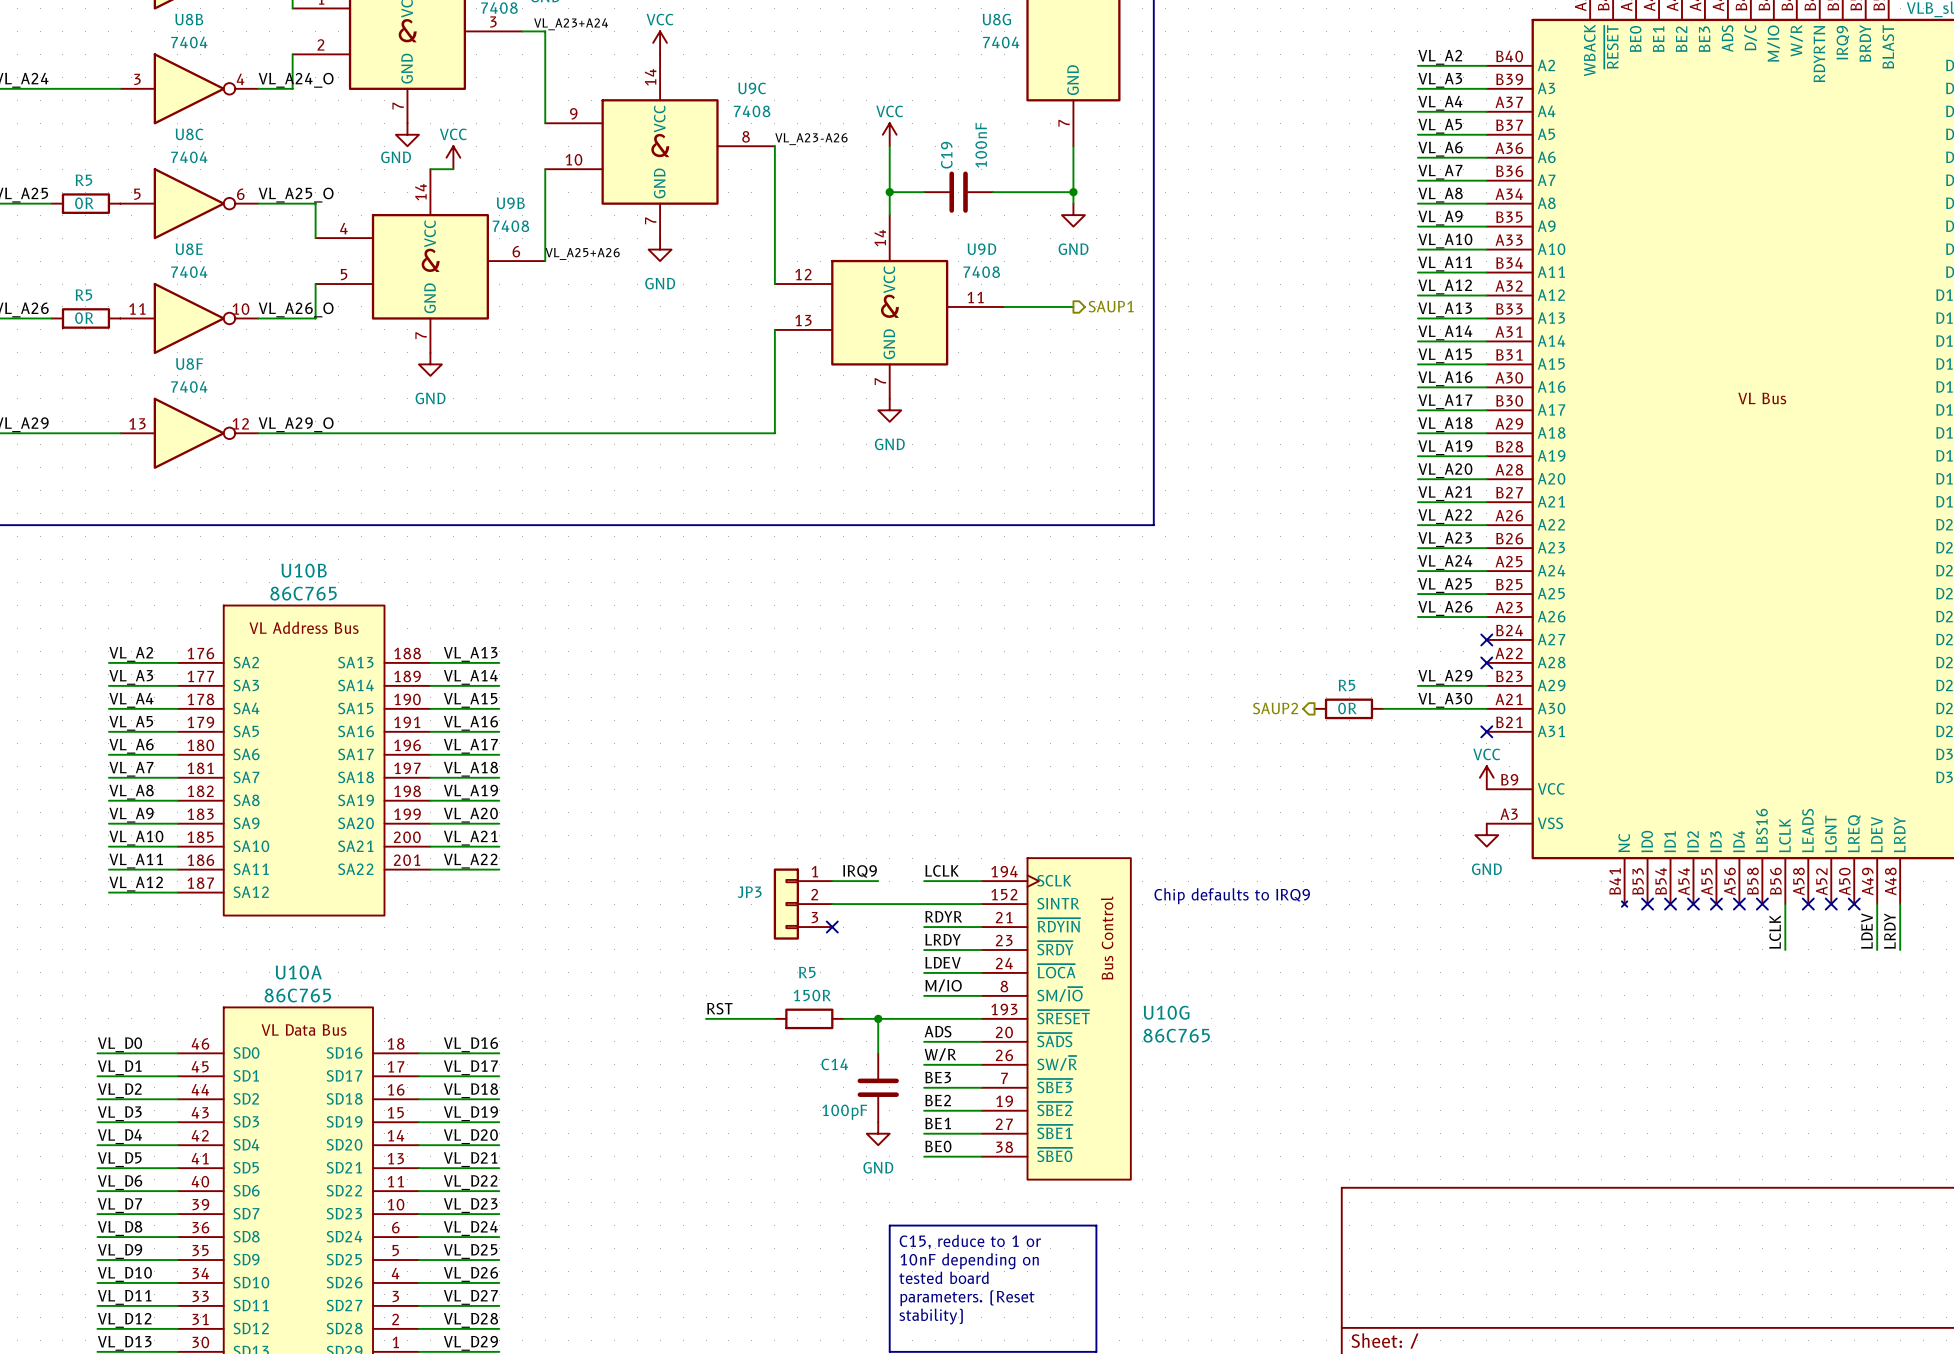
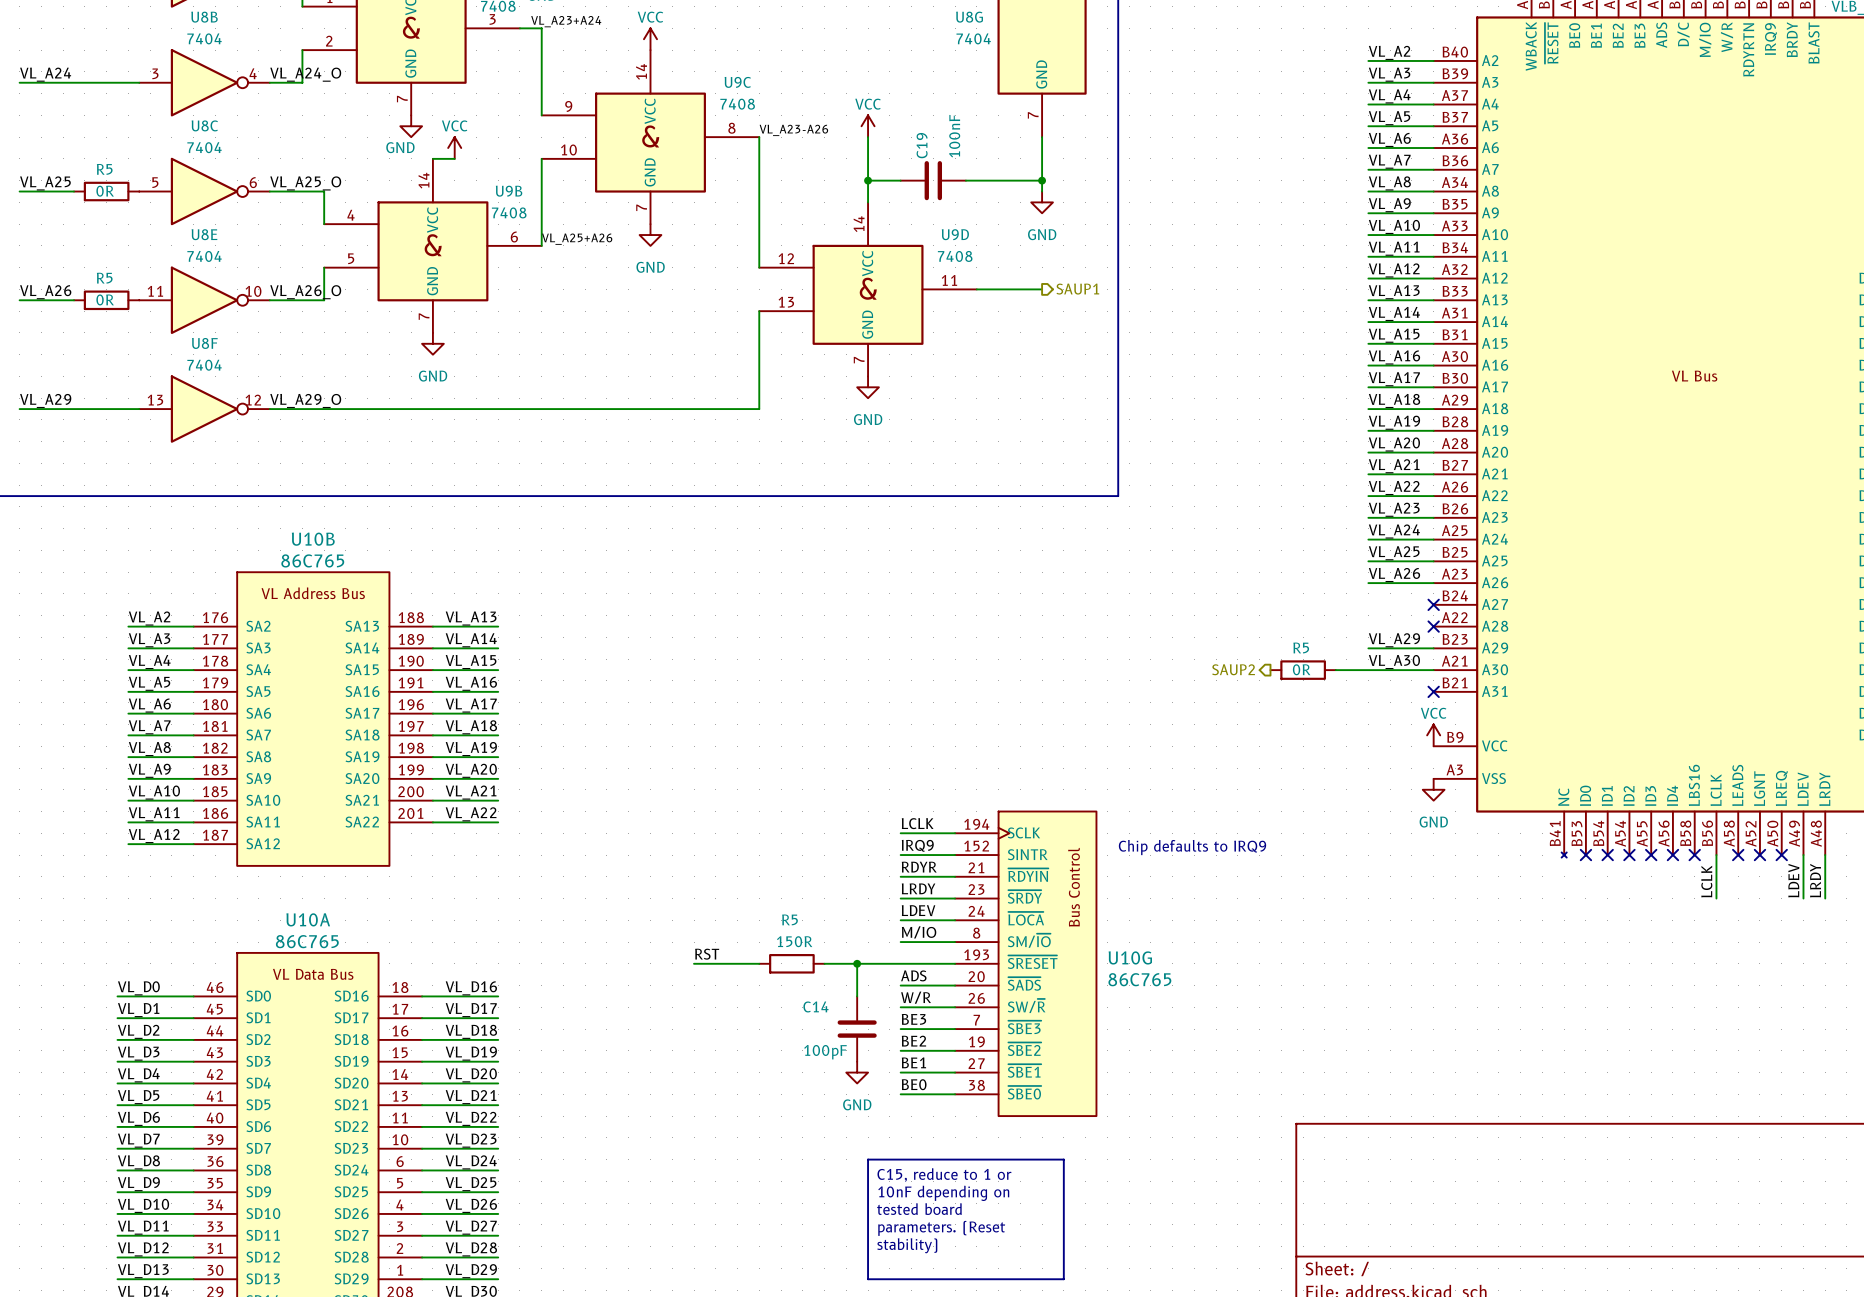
label position: IRQ9 (860, 871) -> IRQ9 (917, 845)
wire: (832, 881) (878, 881) -> none
JP3: (803, 904) -> none
wire: (832, 904) (924, 904) -> none
no-connect mark: (832, 927) -> none

